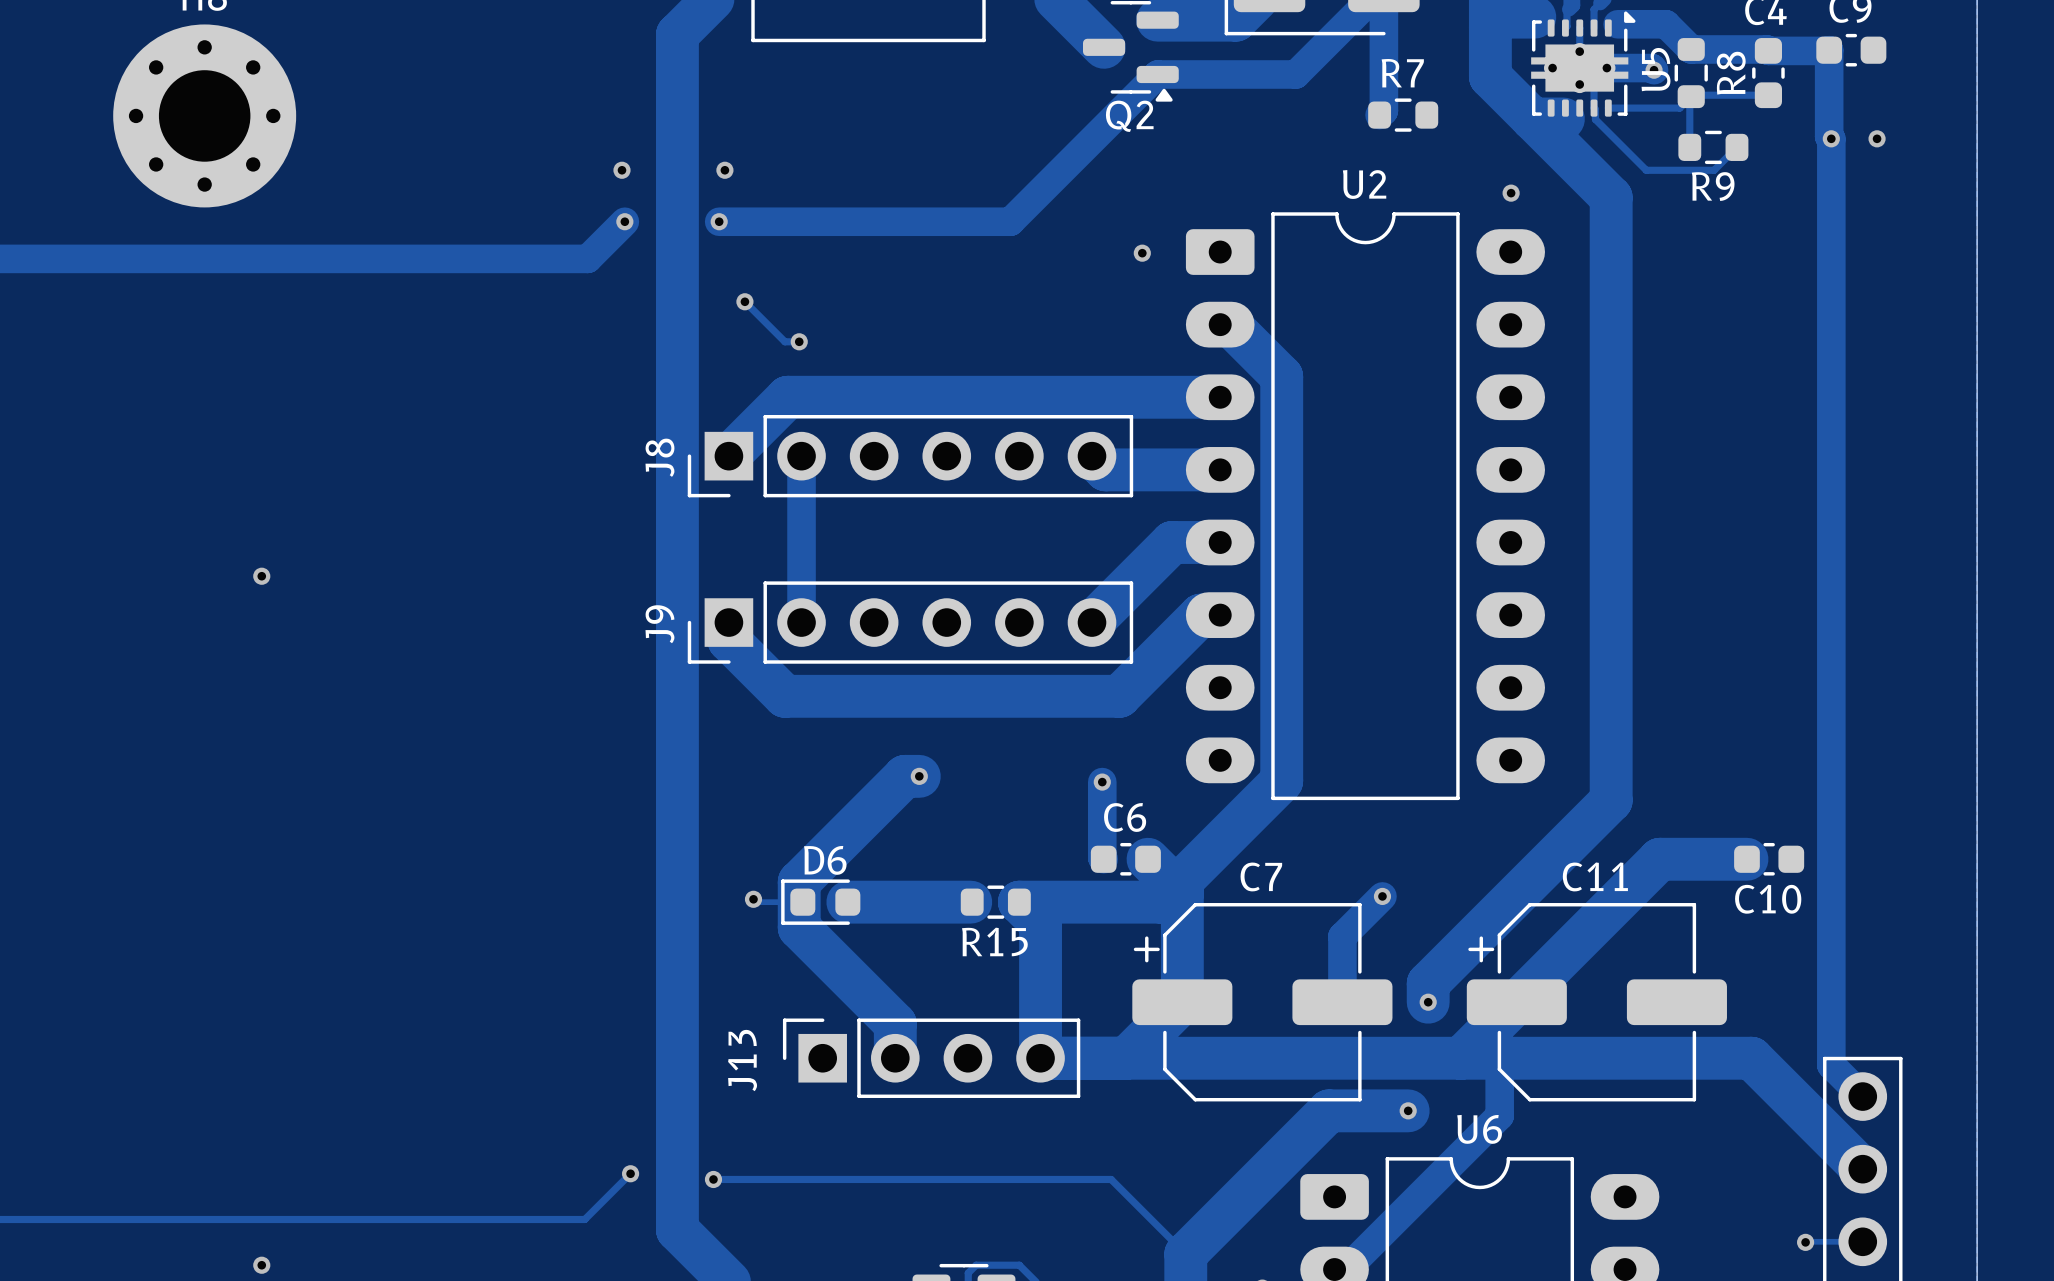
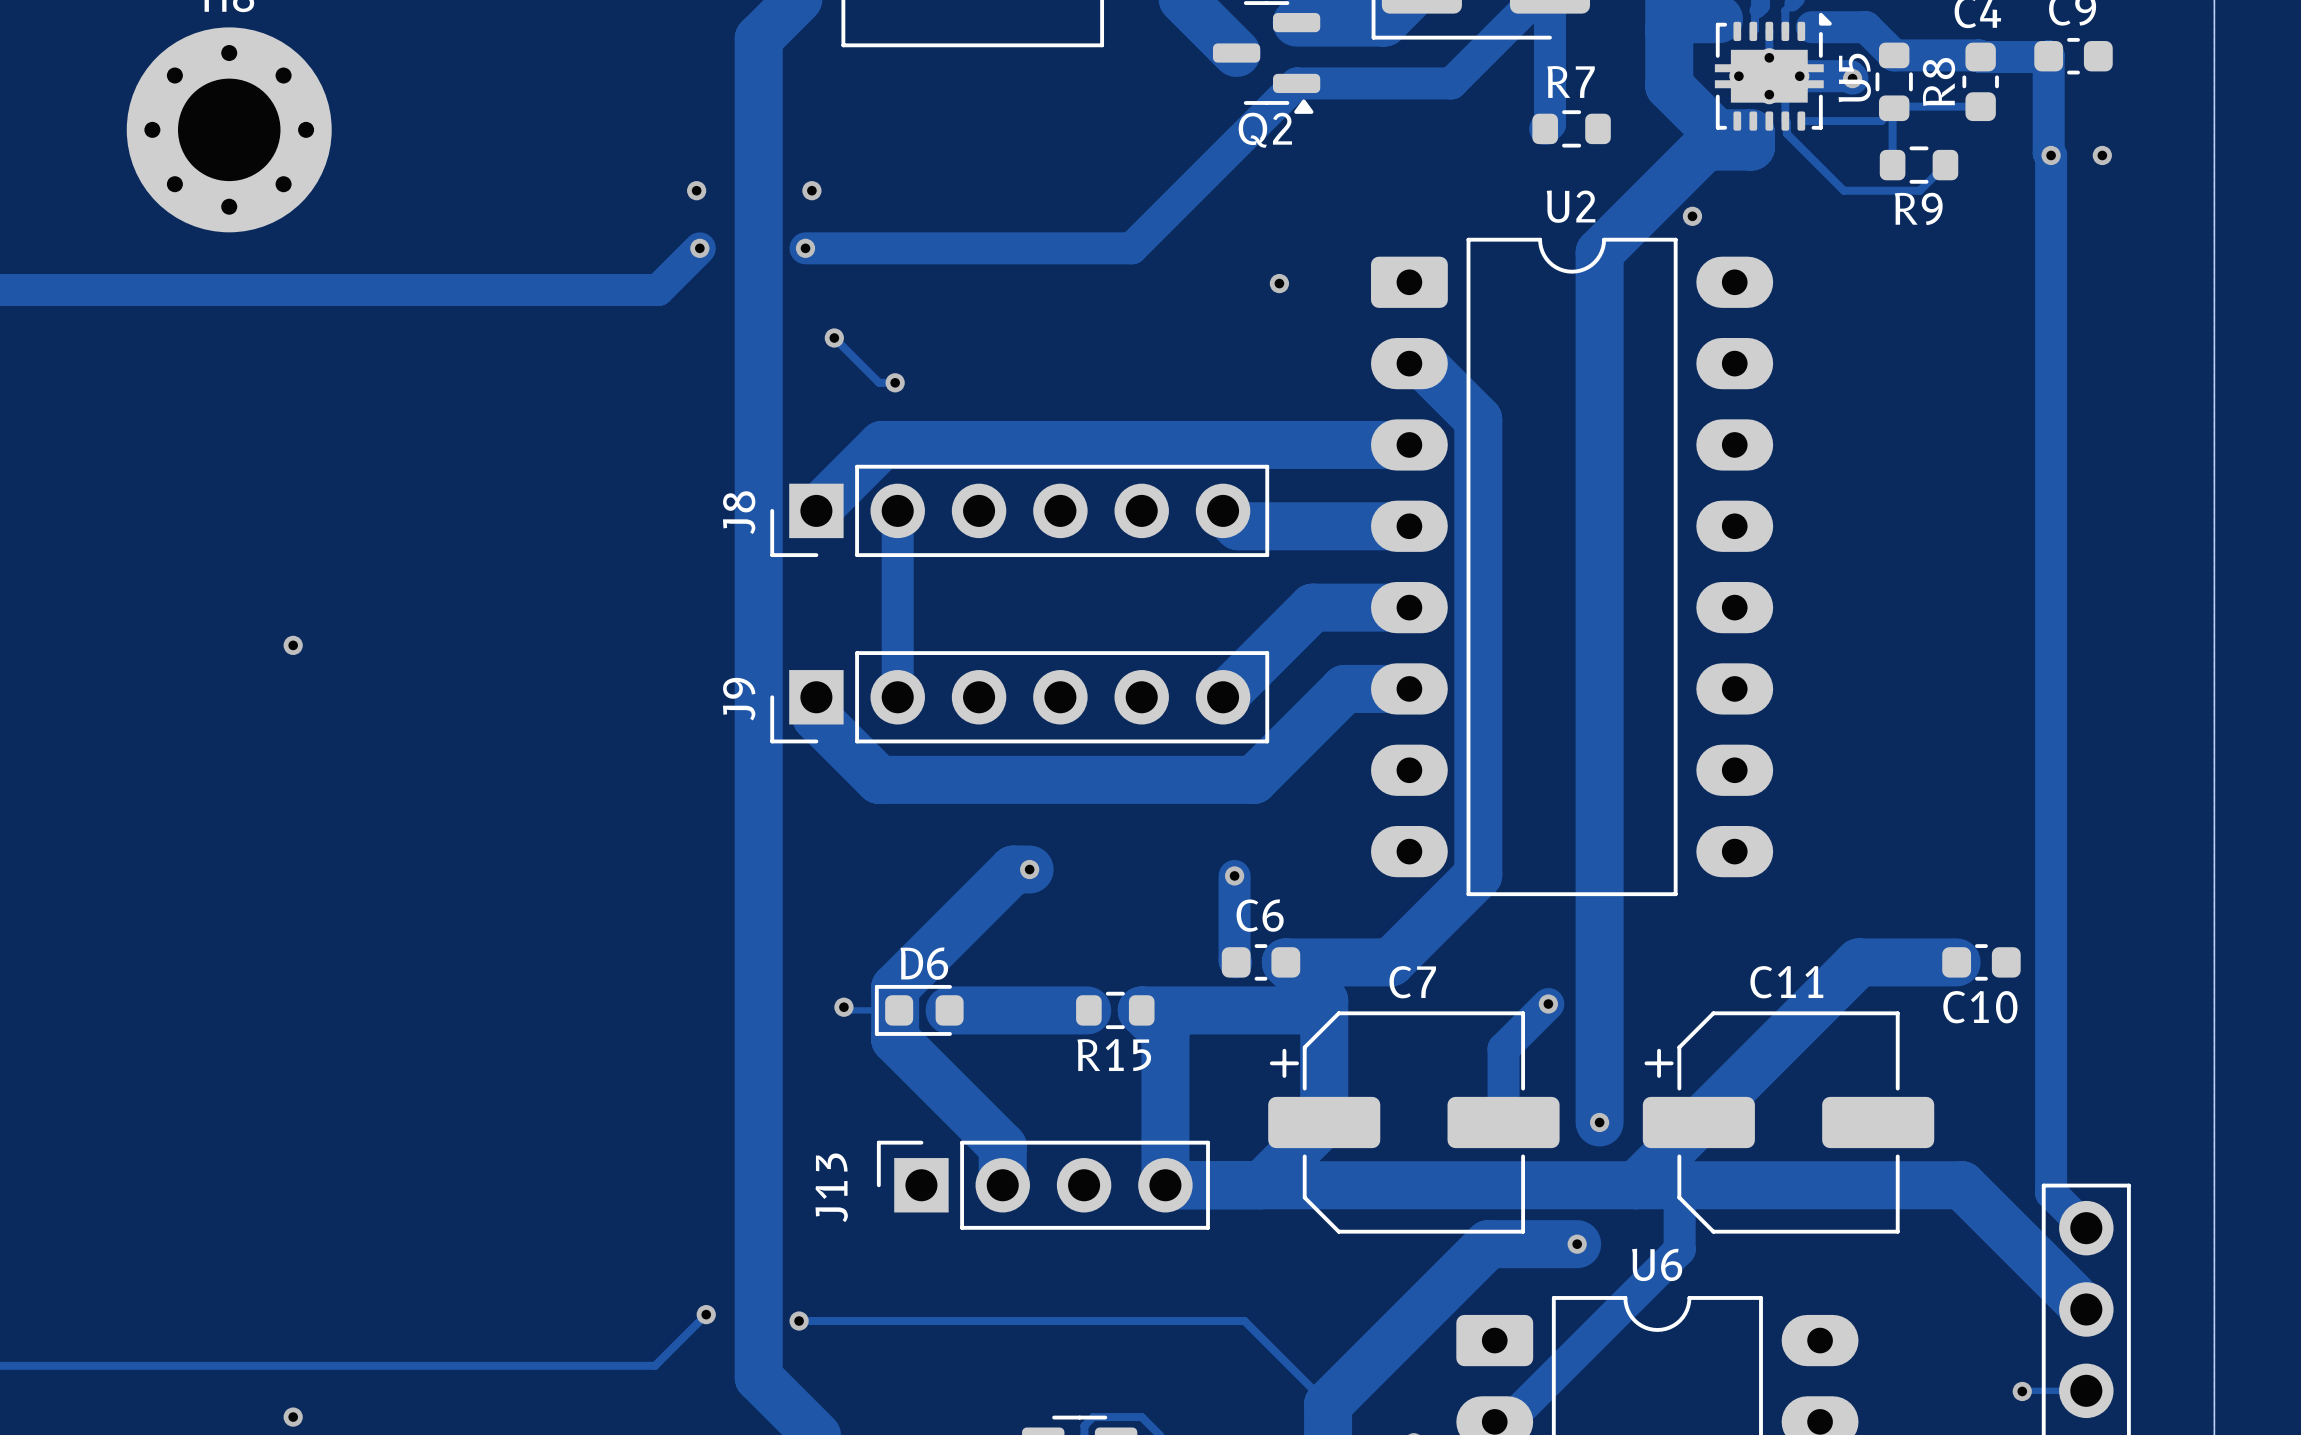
track: (1532, 118) (1611, 197) (1611, 800) (1428, 983) -> (1751, 133) (1751, 146) (1705, 146) (1599, 252) (1599, 1101)
track: (1220, 324) (1229, 324) (1281, 376) (1281, 781) (1160, 902) -> none
track: none -> (1409, 363) (1422, 363) (1478, 419) (1478, 874) (1390, 962) (1285, 962)
U2 position: (1365, 506) -> (1572, 566)

